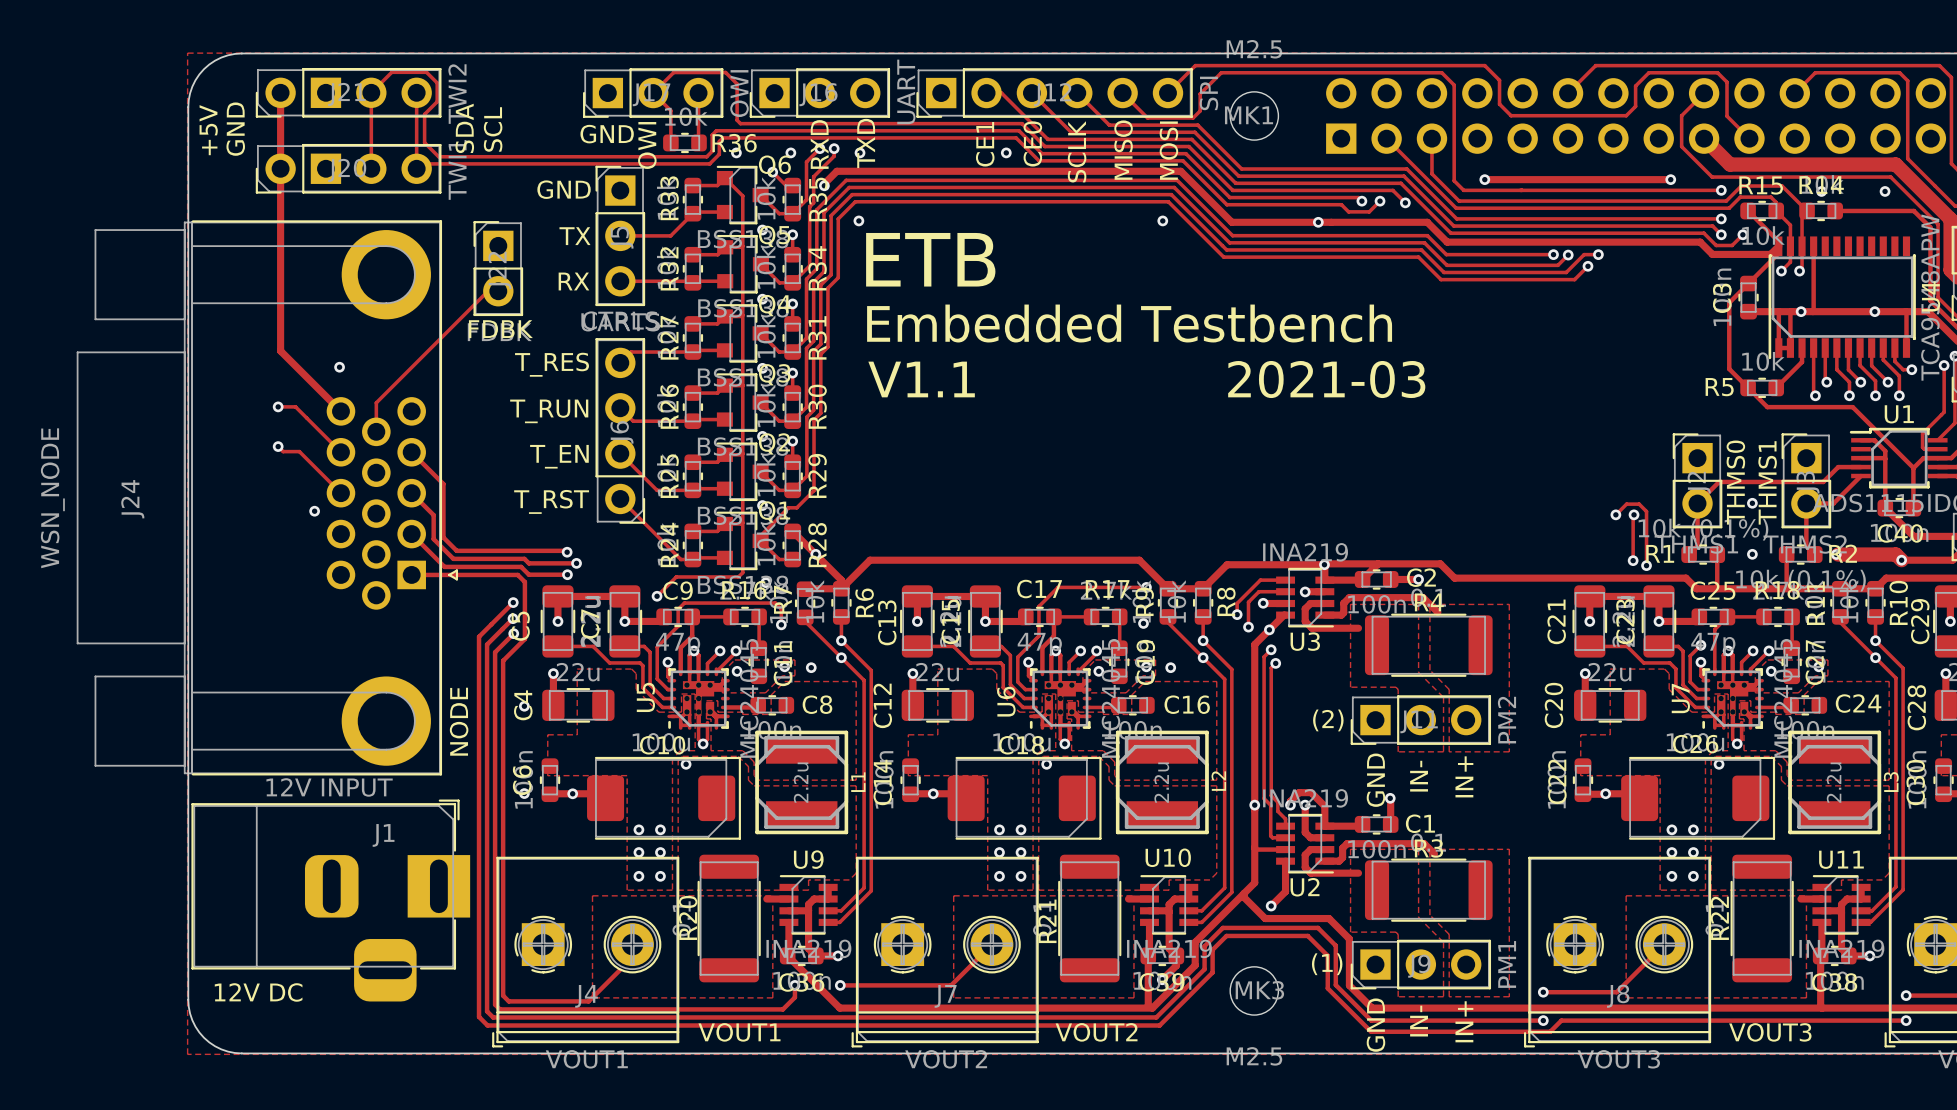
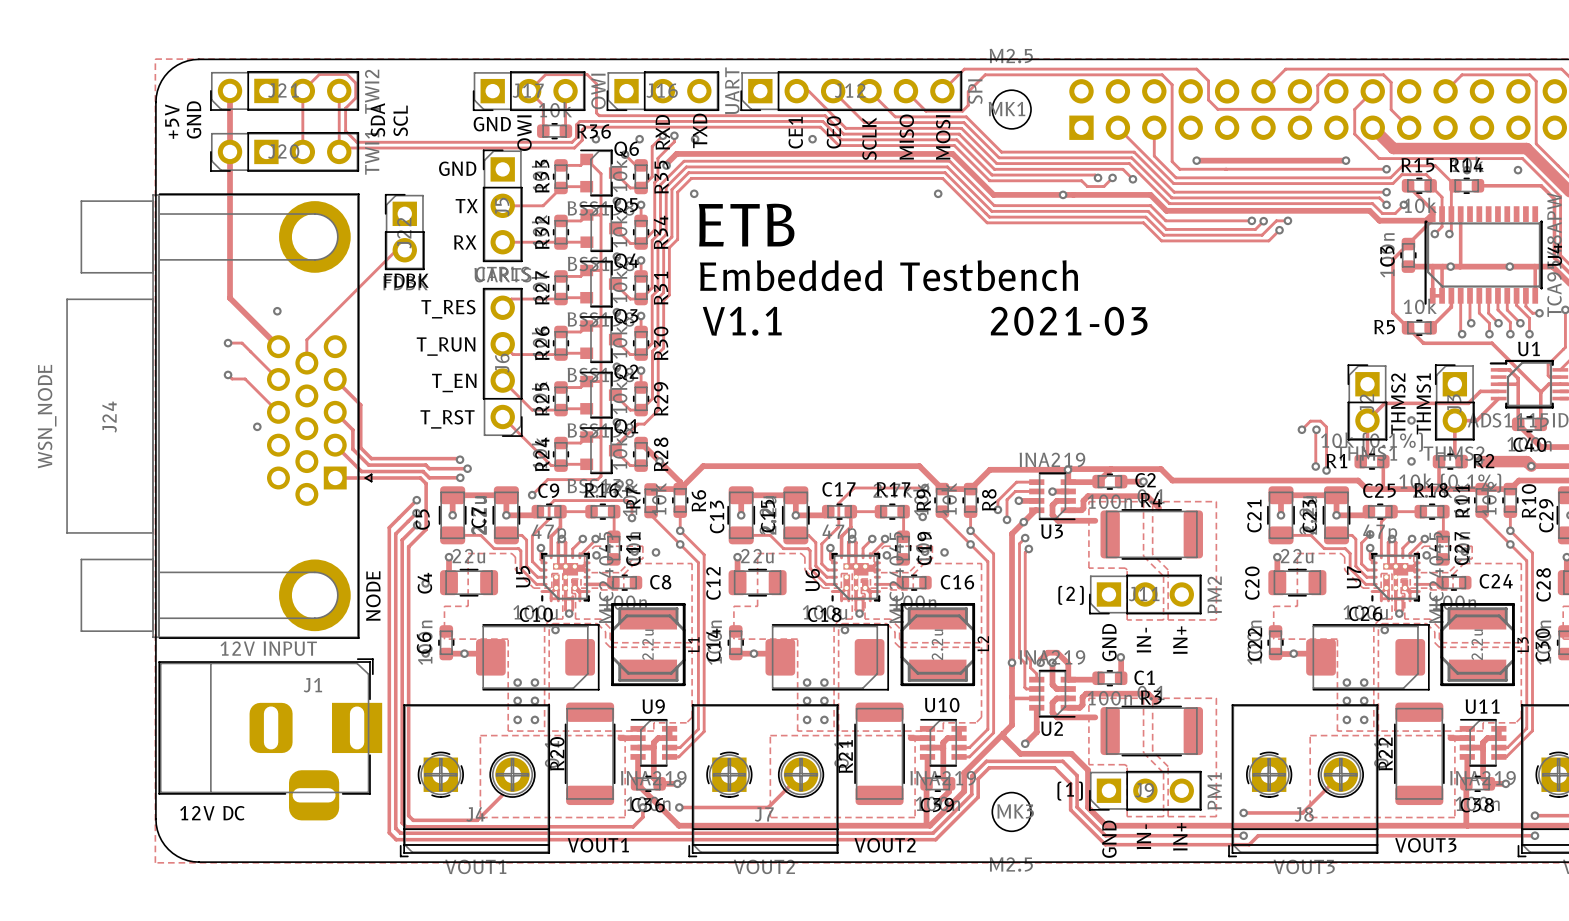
text: THMS0 (1735, 482) -> THMS2 (1398, 403)

